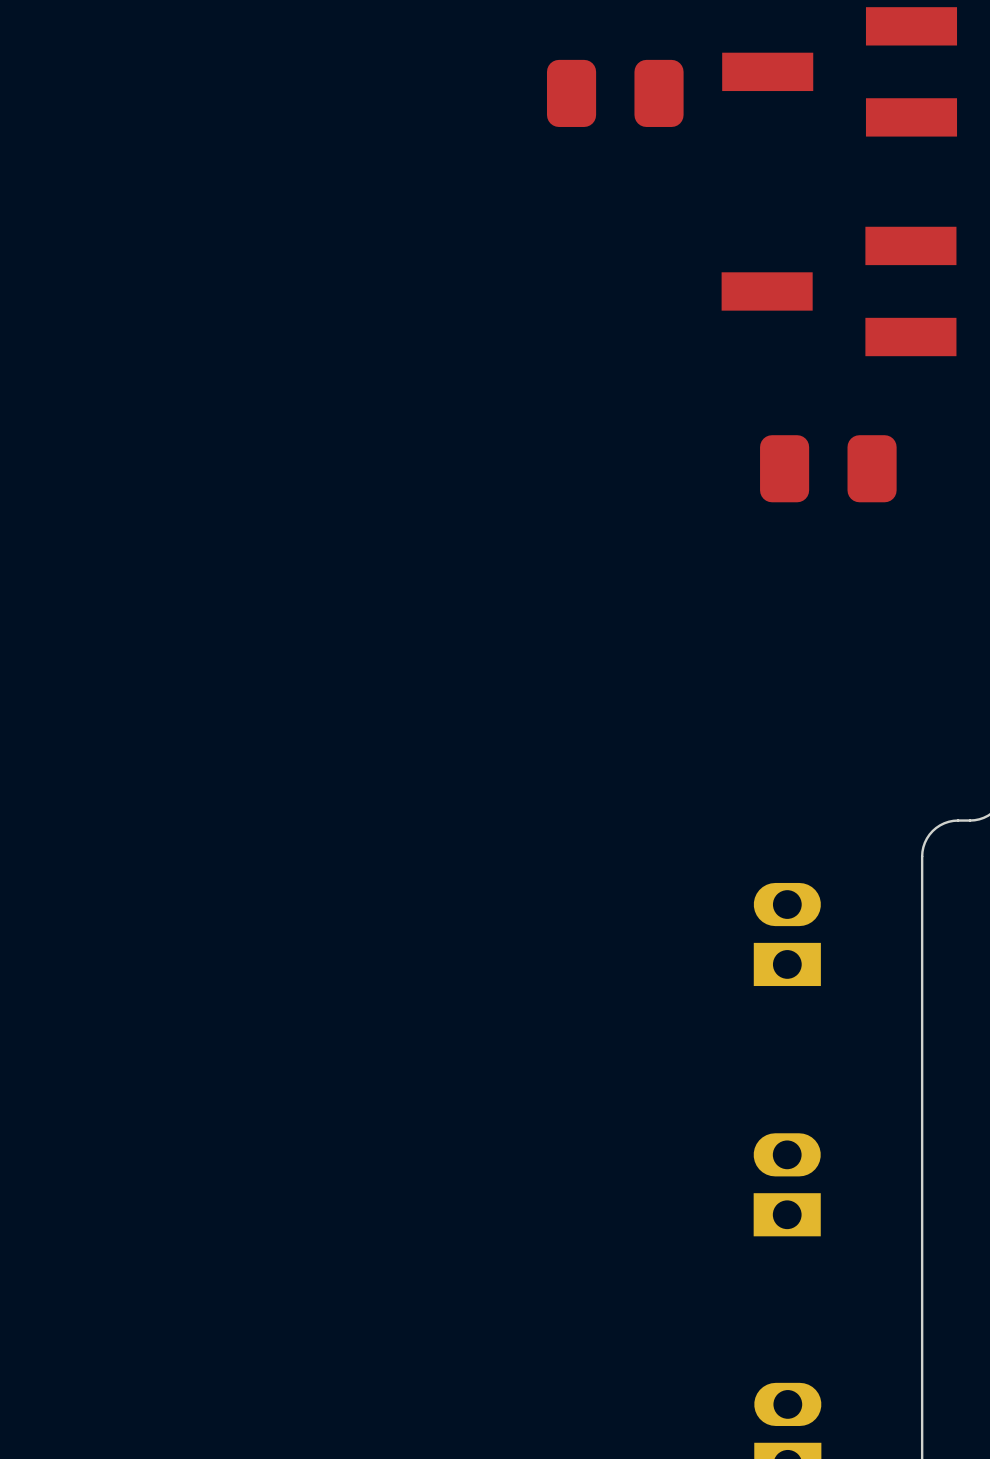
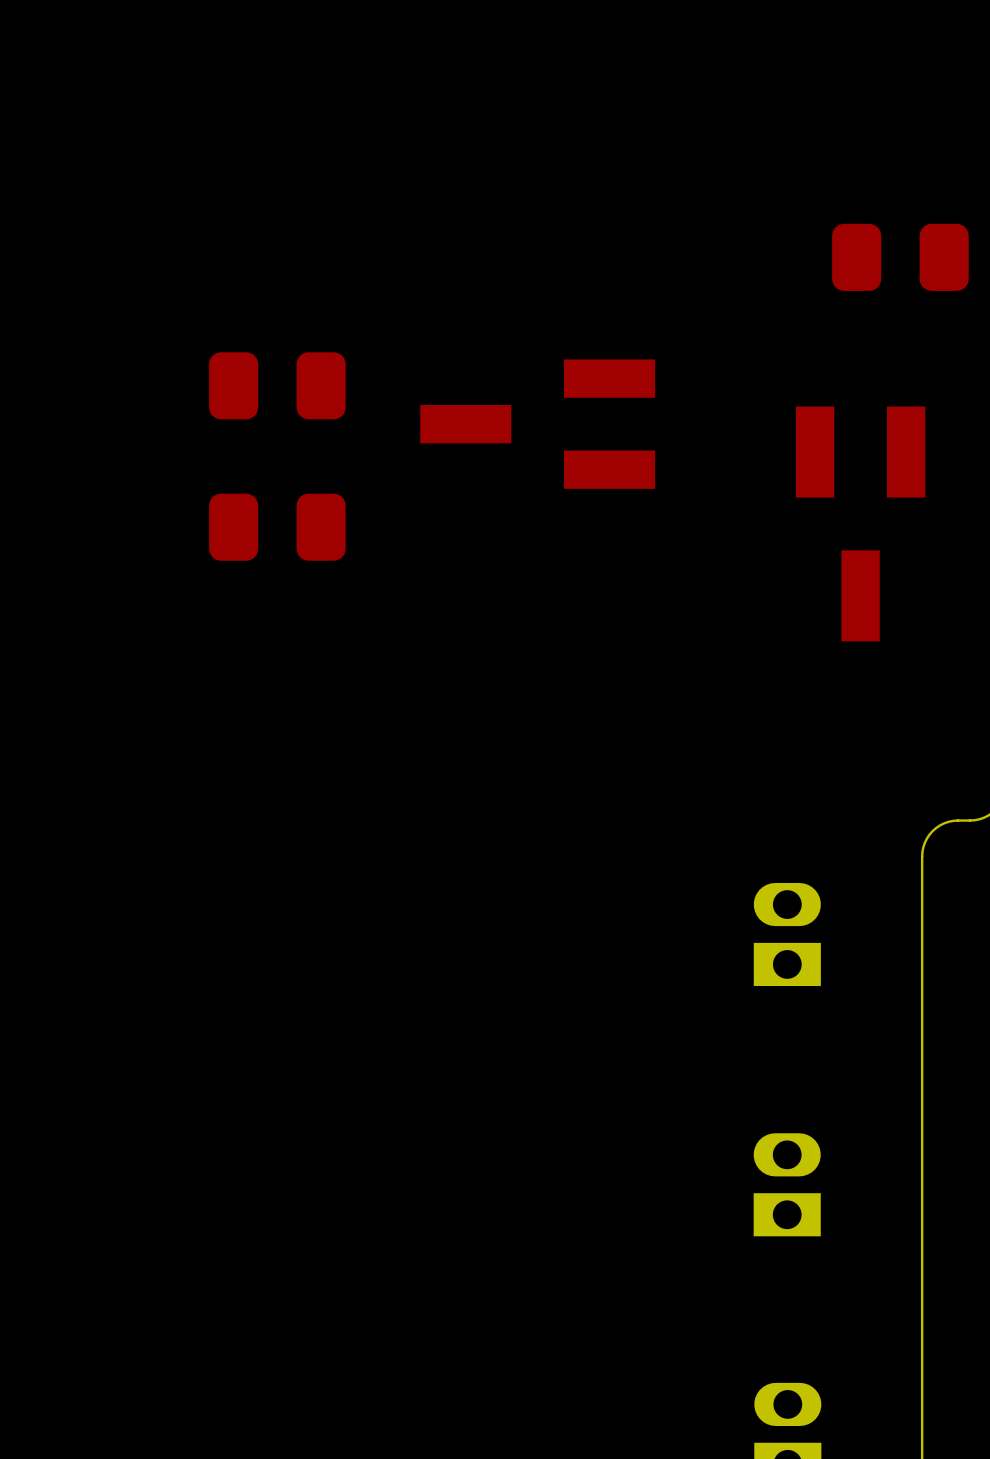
part: (839, 71) -> none
part: (615, 93) -> none
part: none -> (900, 257)
part: (839, 291) -> none
part: none -> (277, 385)
part: none -> (537, 424)
part: (828, 468) -> none
part: none -> (860, 523)
part: none -> (277, 527)

